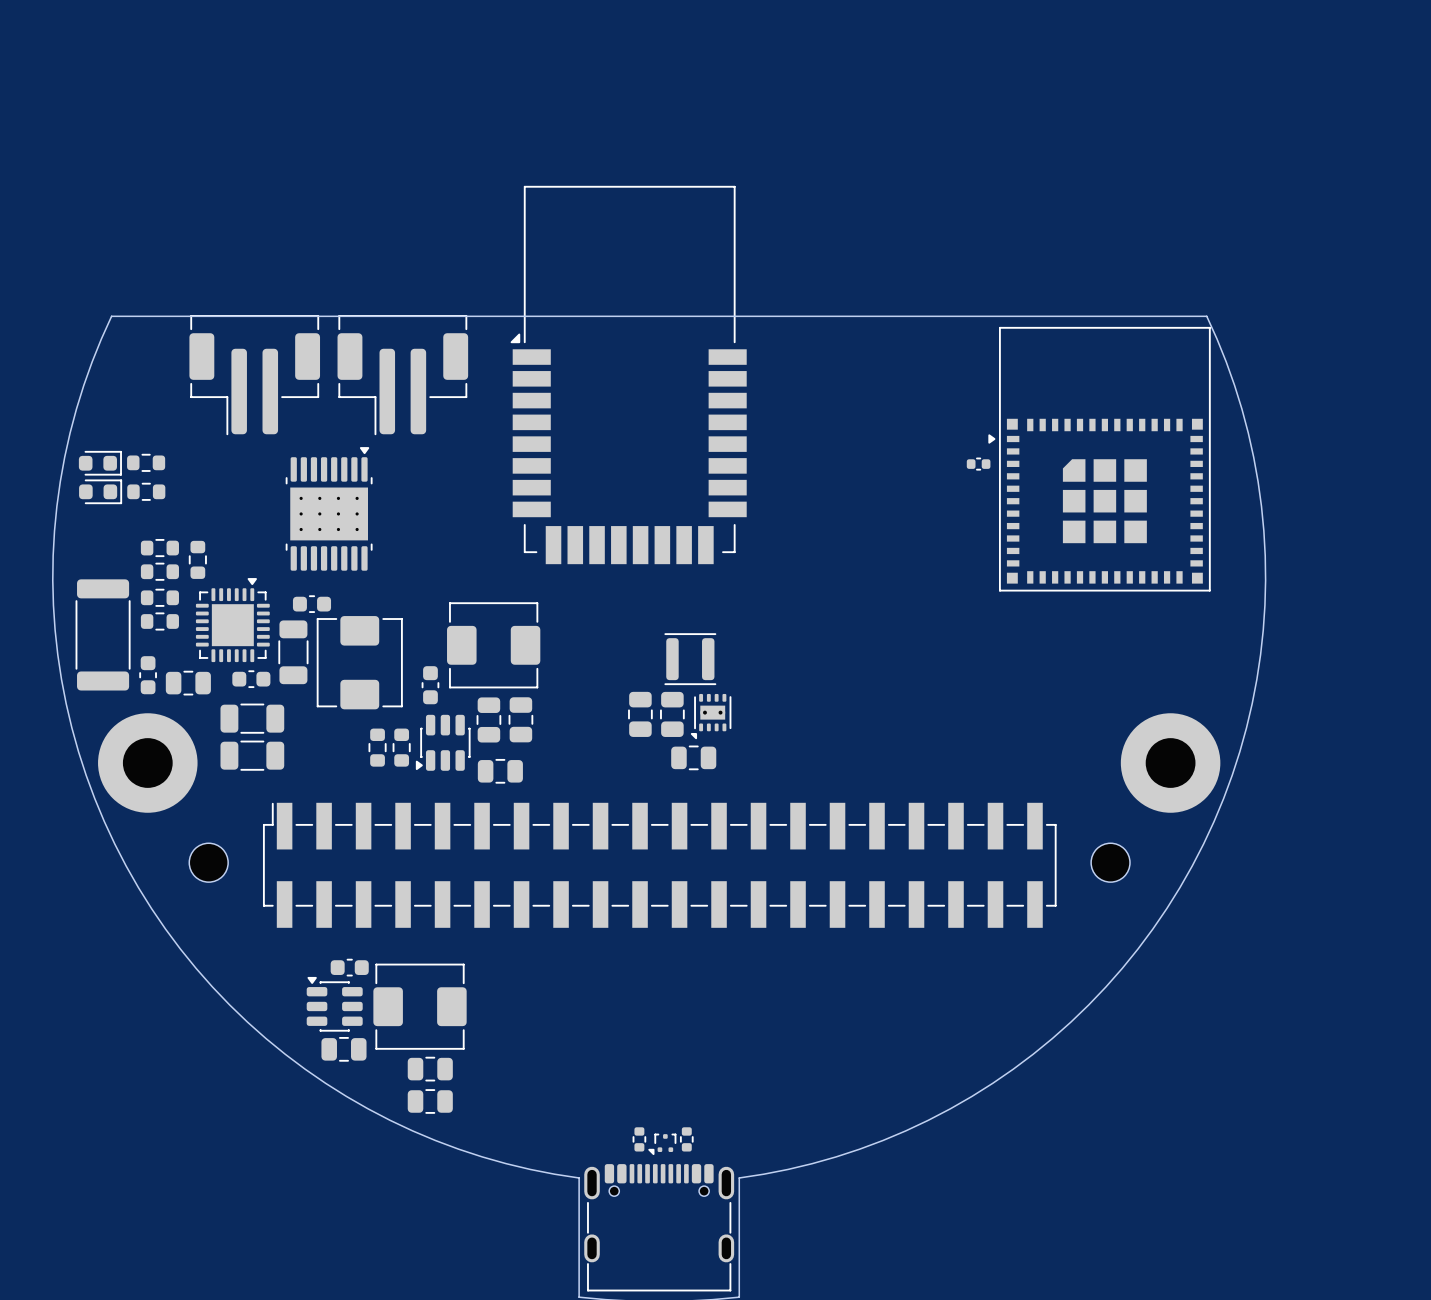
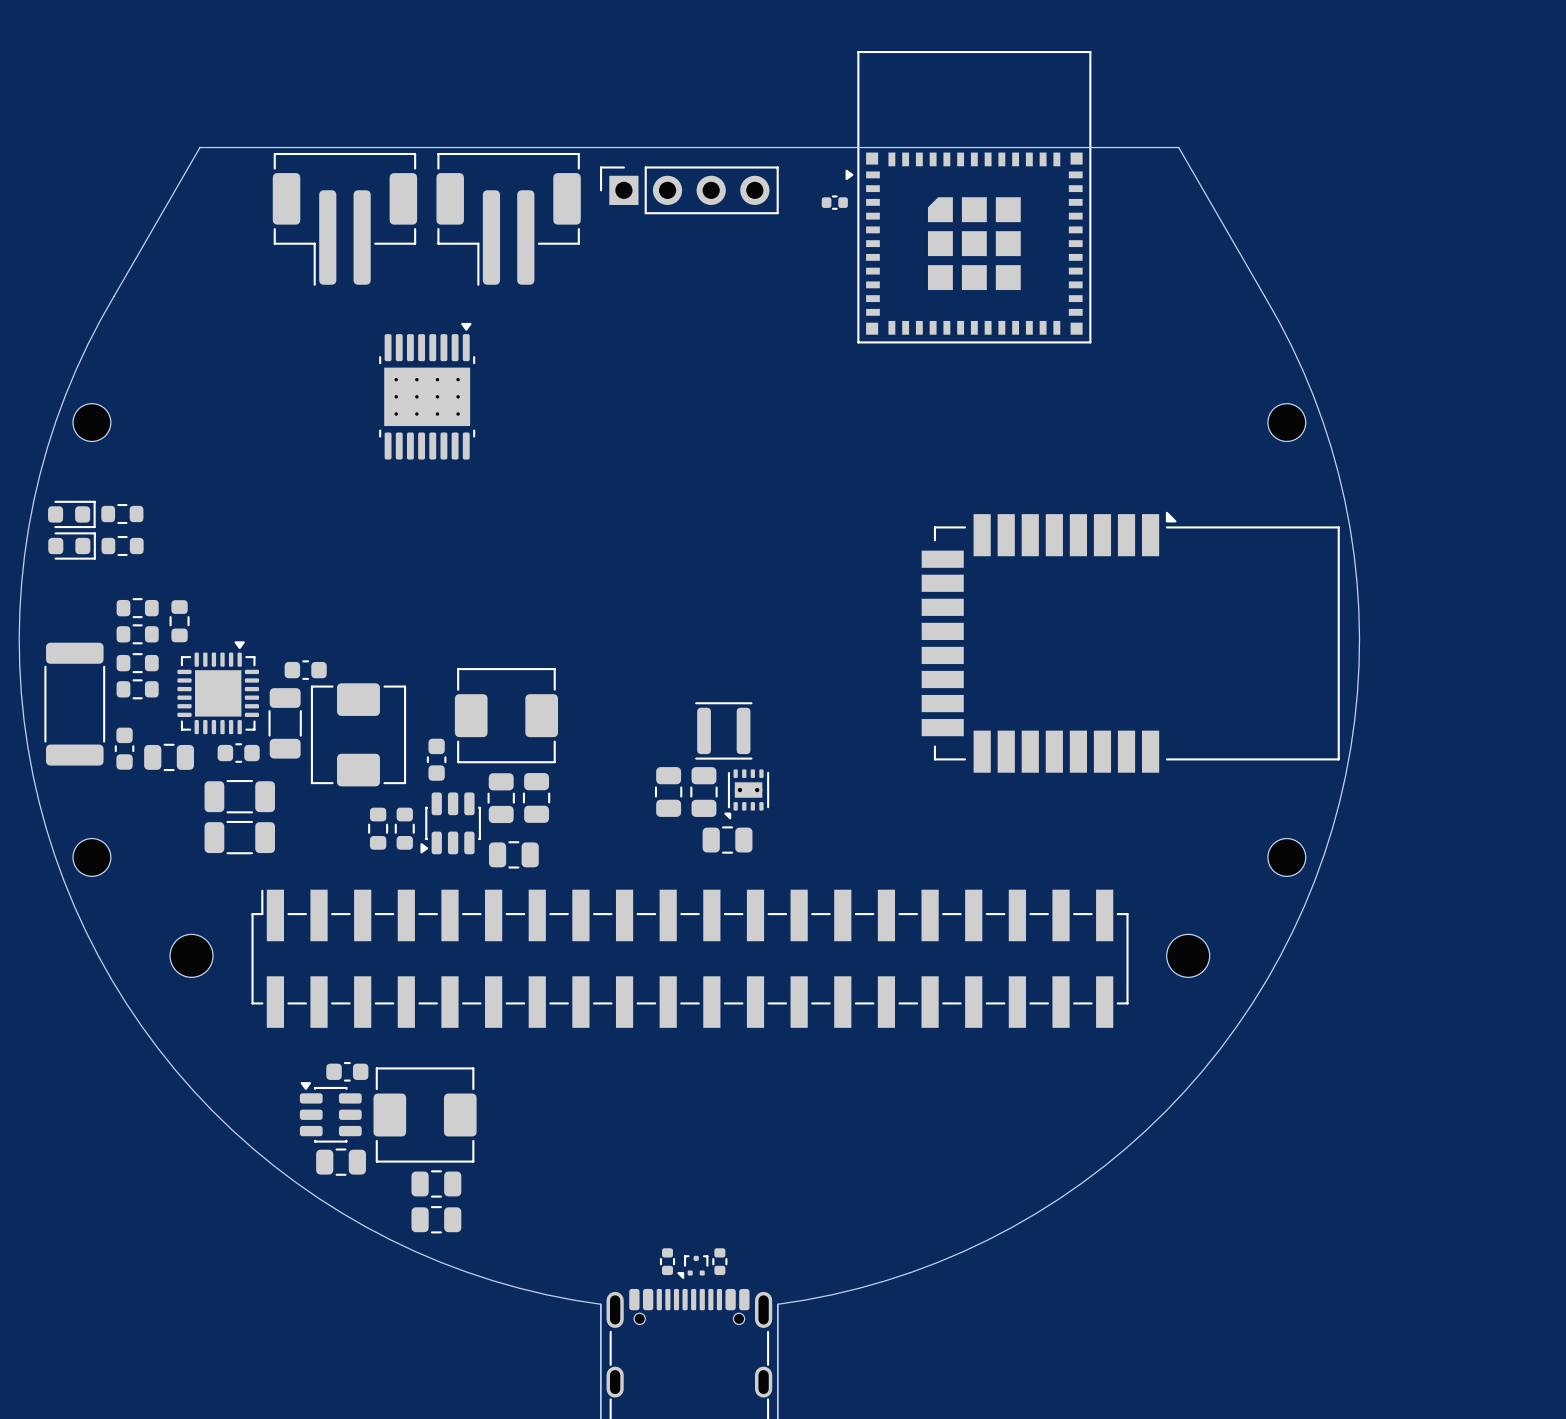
part: none -> (689, 190)
part: none -> (344, 219)
part: none -> (508, 219)
part: (254, 375) -> none
part: (402, 375) -> none
part: (628, 375) -> none
part: none -> (91, 422)
part: none -> (1286, 422)
part position: (1099, 459) -> (968, 197)
part position: (978, 464) -> (834, 202)
part position: (329, 508) -> (427, 391)
part: none -> (1130, 642)
part: (147, 763) -> none
part: (1170, 763) -> none
part: none -> (91, 857)
part: none -> (1286, 857)
board edge: (579, 1177) (506, 1163) (458, 1149) (390, 1120) (325, 1083) (266, 1038) (212, 986) (165, 929) (126, 866) (94, 798) (71, 727) (57, 654) (52, 580) (56, 506) (64, 457) (83, 385) (111, 316) (1206, 316) (1234, 385) (1253, 457) (1261, 506) (1265, 580) (1260, 654) (1246, 727) (1223, 798) (1192, 866) (1166, 908) (1122, 968) (1070, 1022) (1013, 1069) (950, 1108) (882, 1140) (812, 1163) (739, 1177) -> (600, 1304) (519, 1288) (466, 1272) (415, 1251) (366, 1227) (319, 1198) (253, 1148) (193, 1091) (158, 1048) (126, 1003) (85, 931) (54, 854) (32, 775) (21, 693) (19, 637) (21, 582) (33, 500) (55, 421) (87, 344) (199, 147) (1178, 147) (1291, 344) (1322, 421) (1344, 500) (1357, 582) (1359, 665) (1350, 747) (1339, 801) (1314, 880) (1280, 956) (1236, 1026) (1203, 1070) (1146, 1130) (1082, 1182) (1012, 1227) (937, 1262) (859, 1288) (777, 1304)

